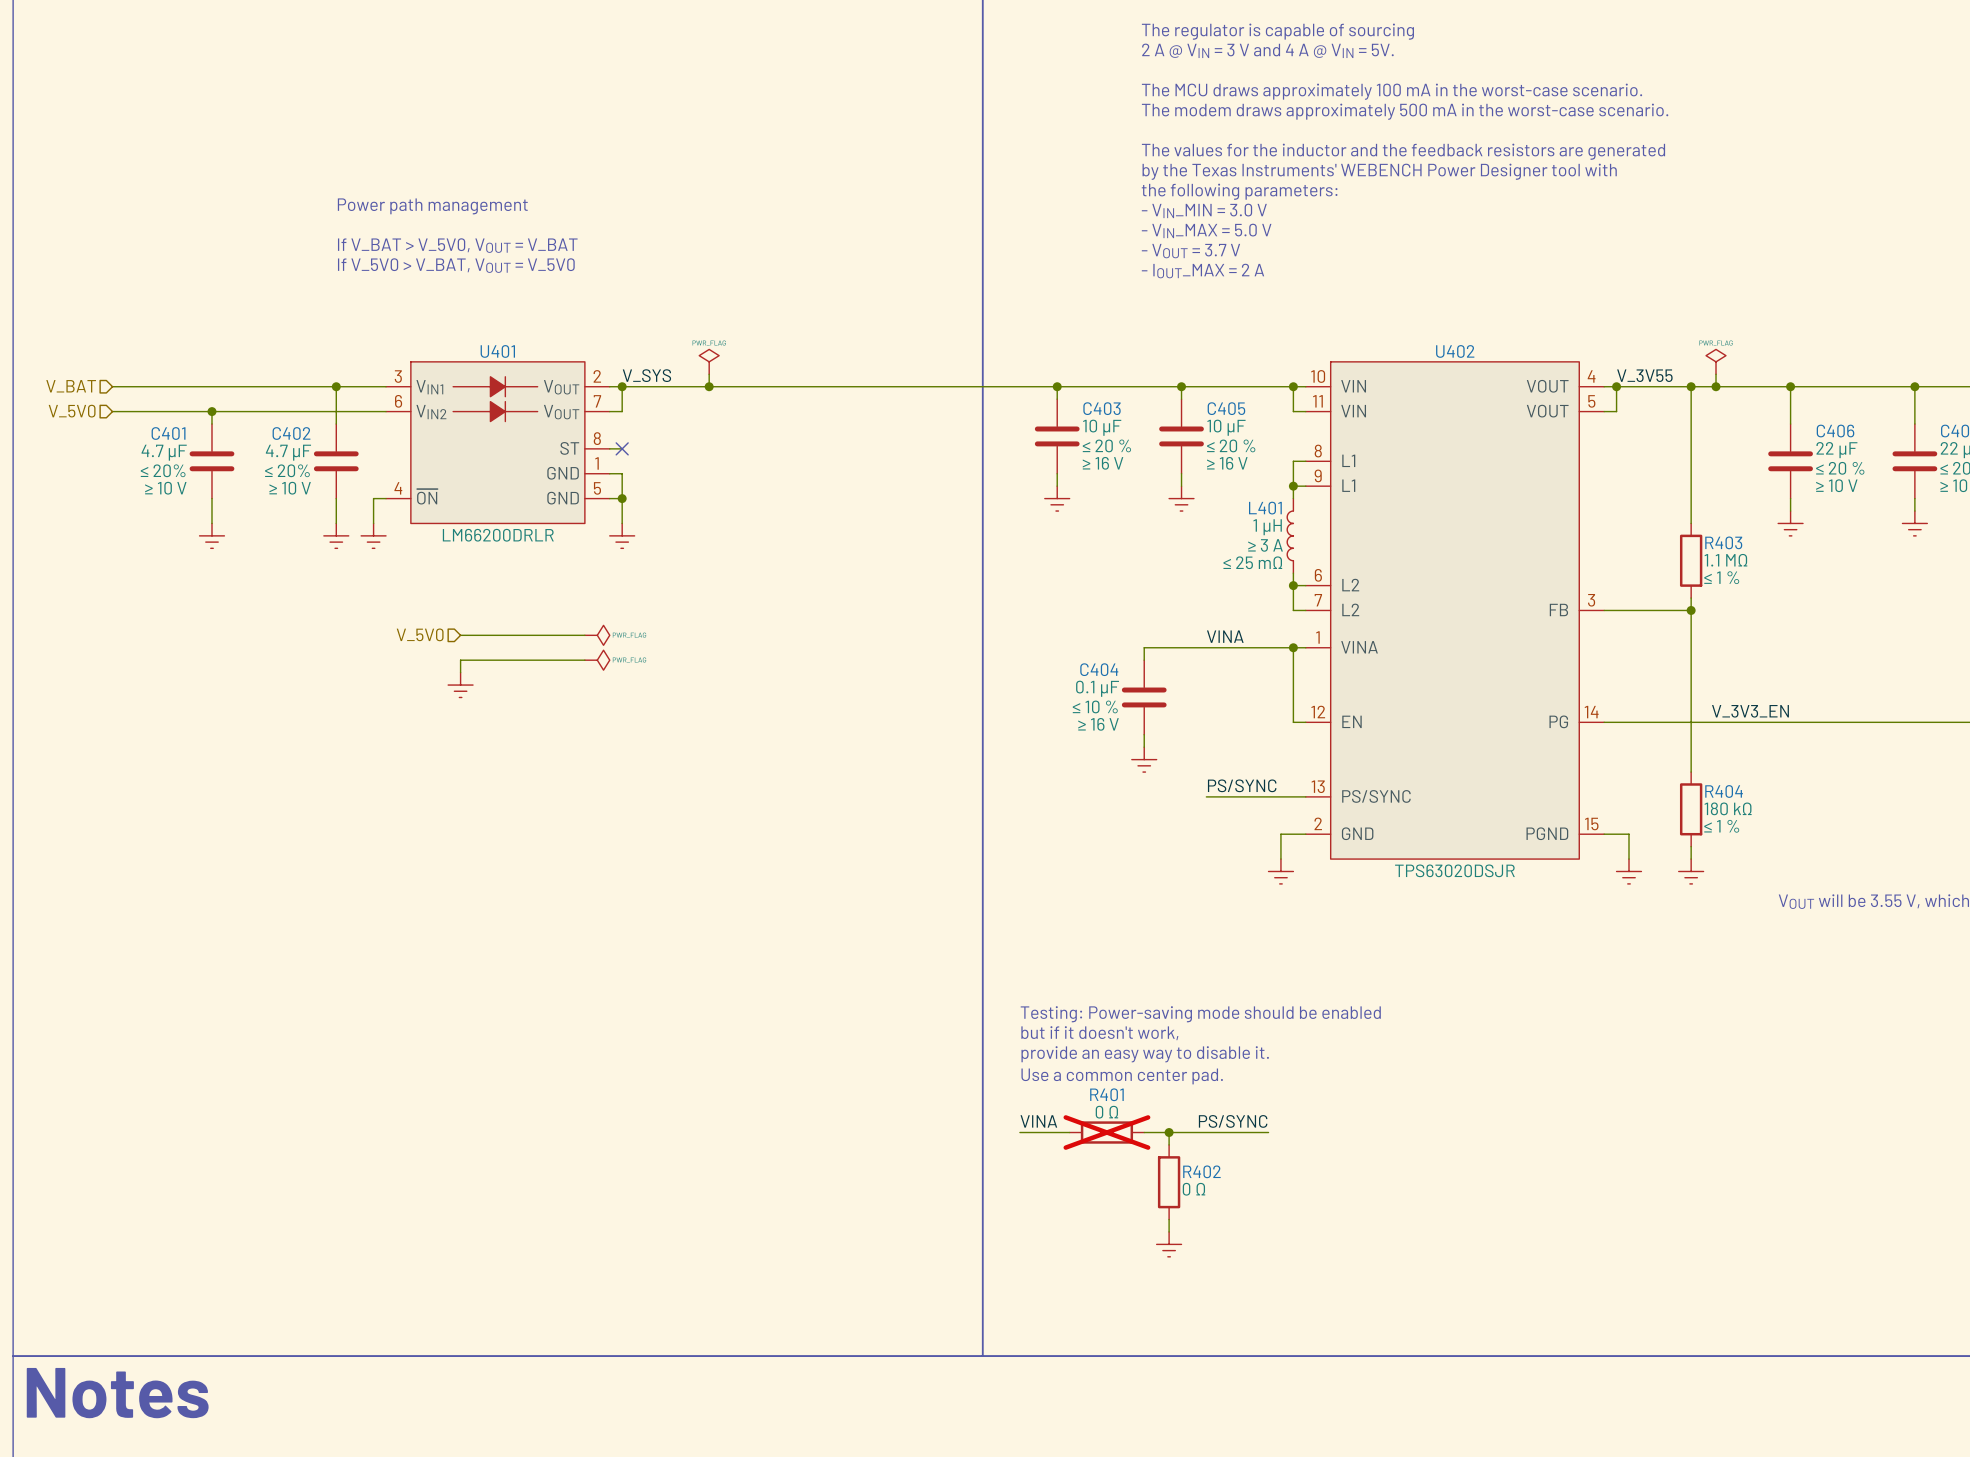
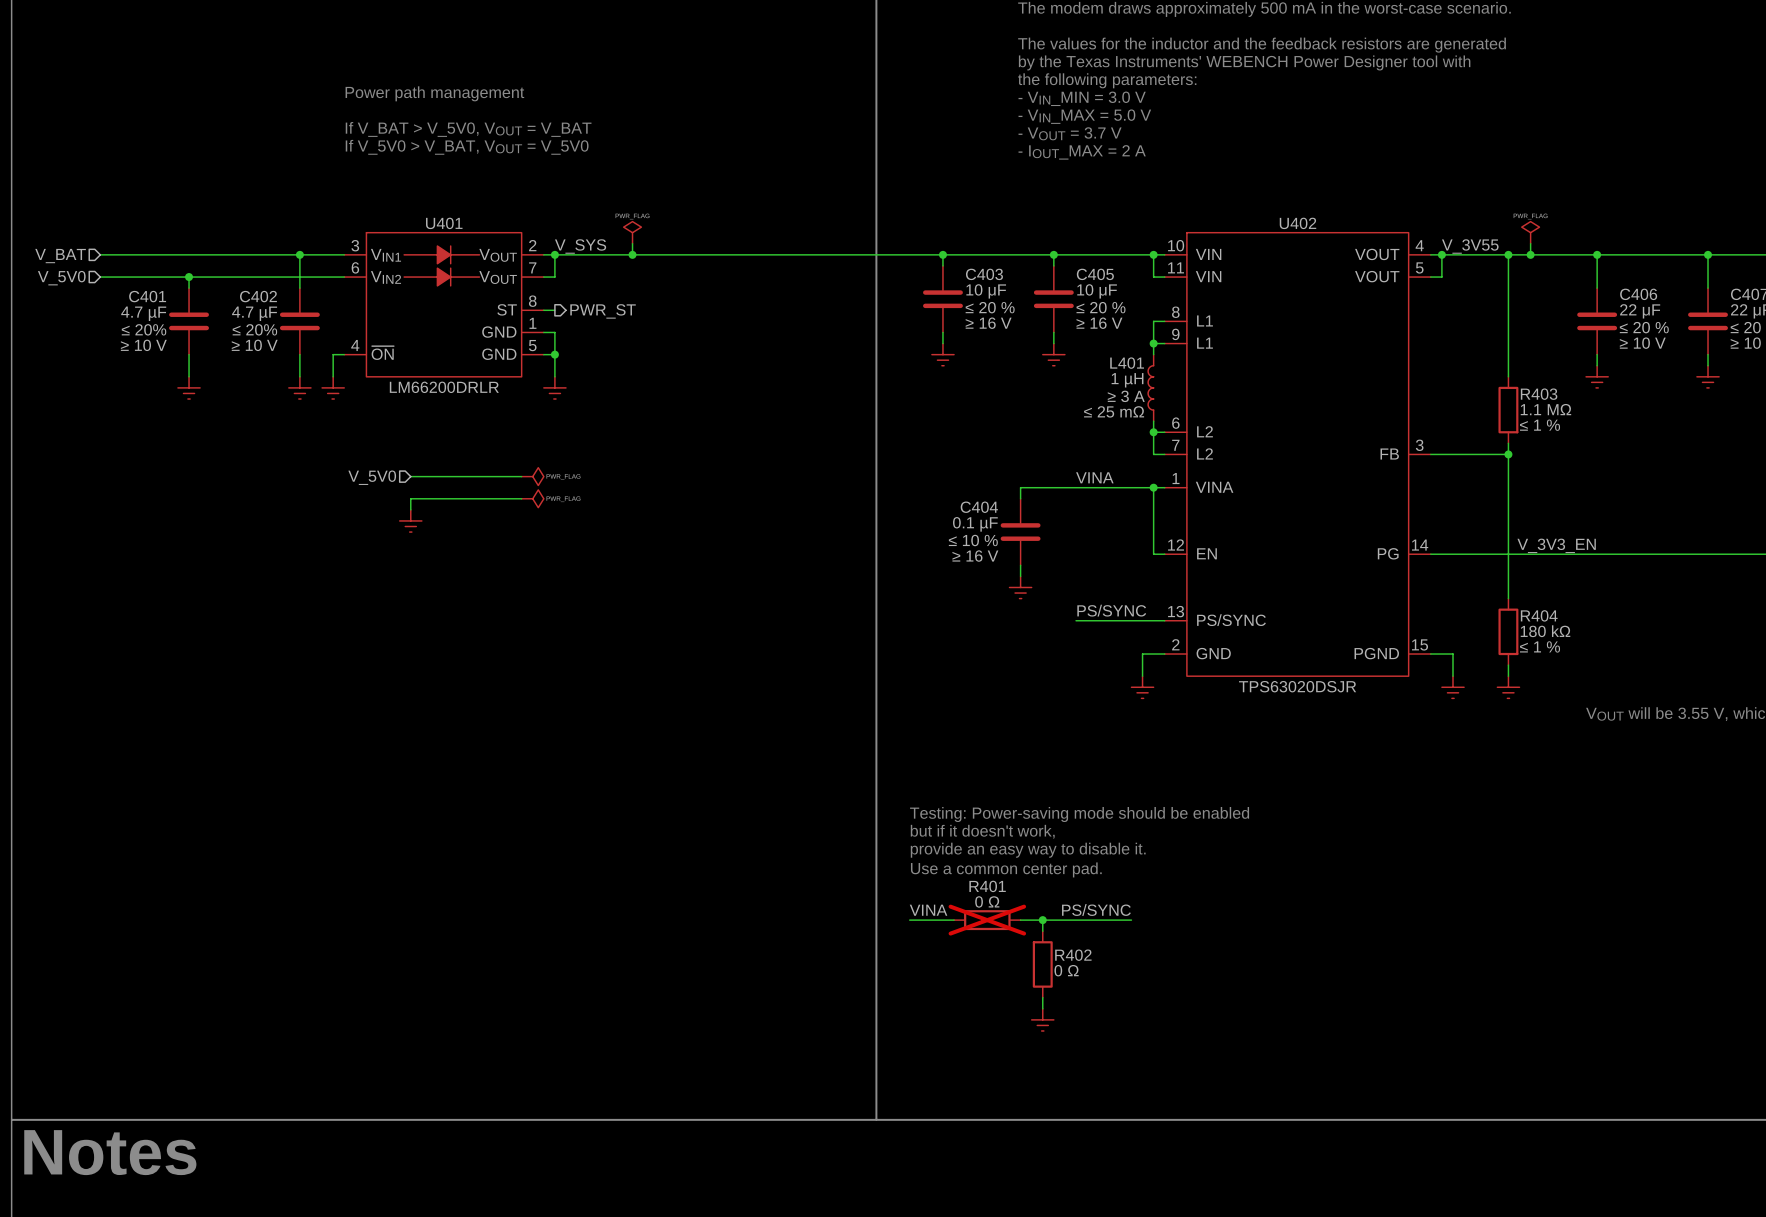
text position: Power path management (432, 206) -> Power path management (434, 93)
text position: If V_BAT > V_5V0, VOUT = V_BAT (457, 245) -> If V_BAT > V_5V0, VOUT = V_BAT (468, 129)
text position: If V_5V0 > V_BAT, VOUT = V_5V0 (456, 265) -> If V_5V0 > V_BAT, VOUT = V_5V0 (467, 147)
no-connect mark: (622, 448) -> none
hierarchical label: none -> PWR_ST (603, 311)

